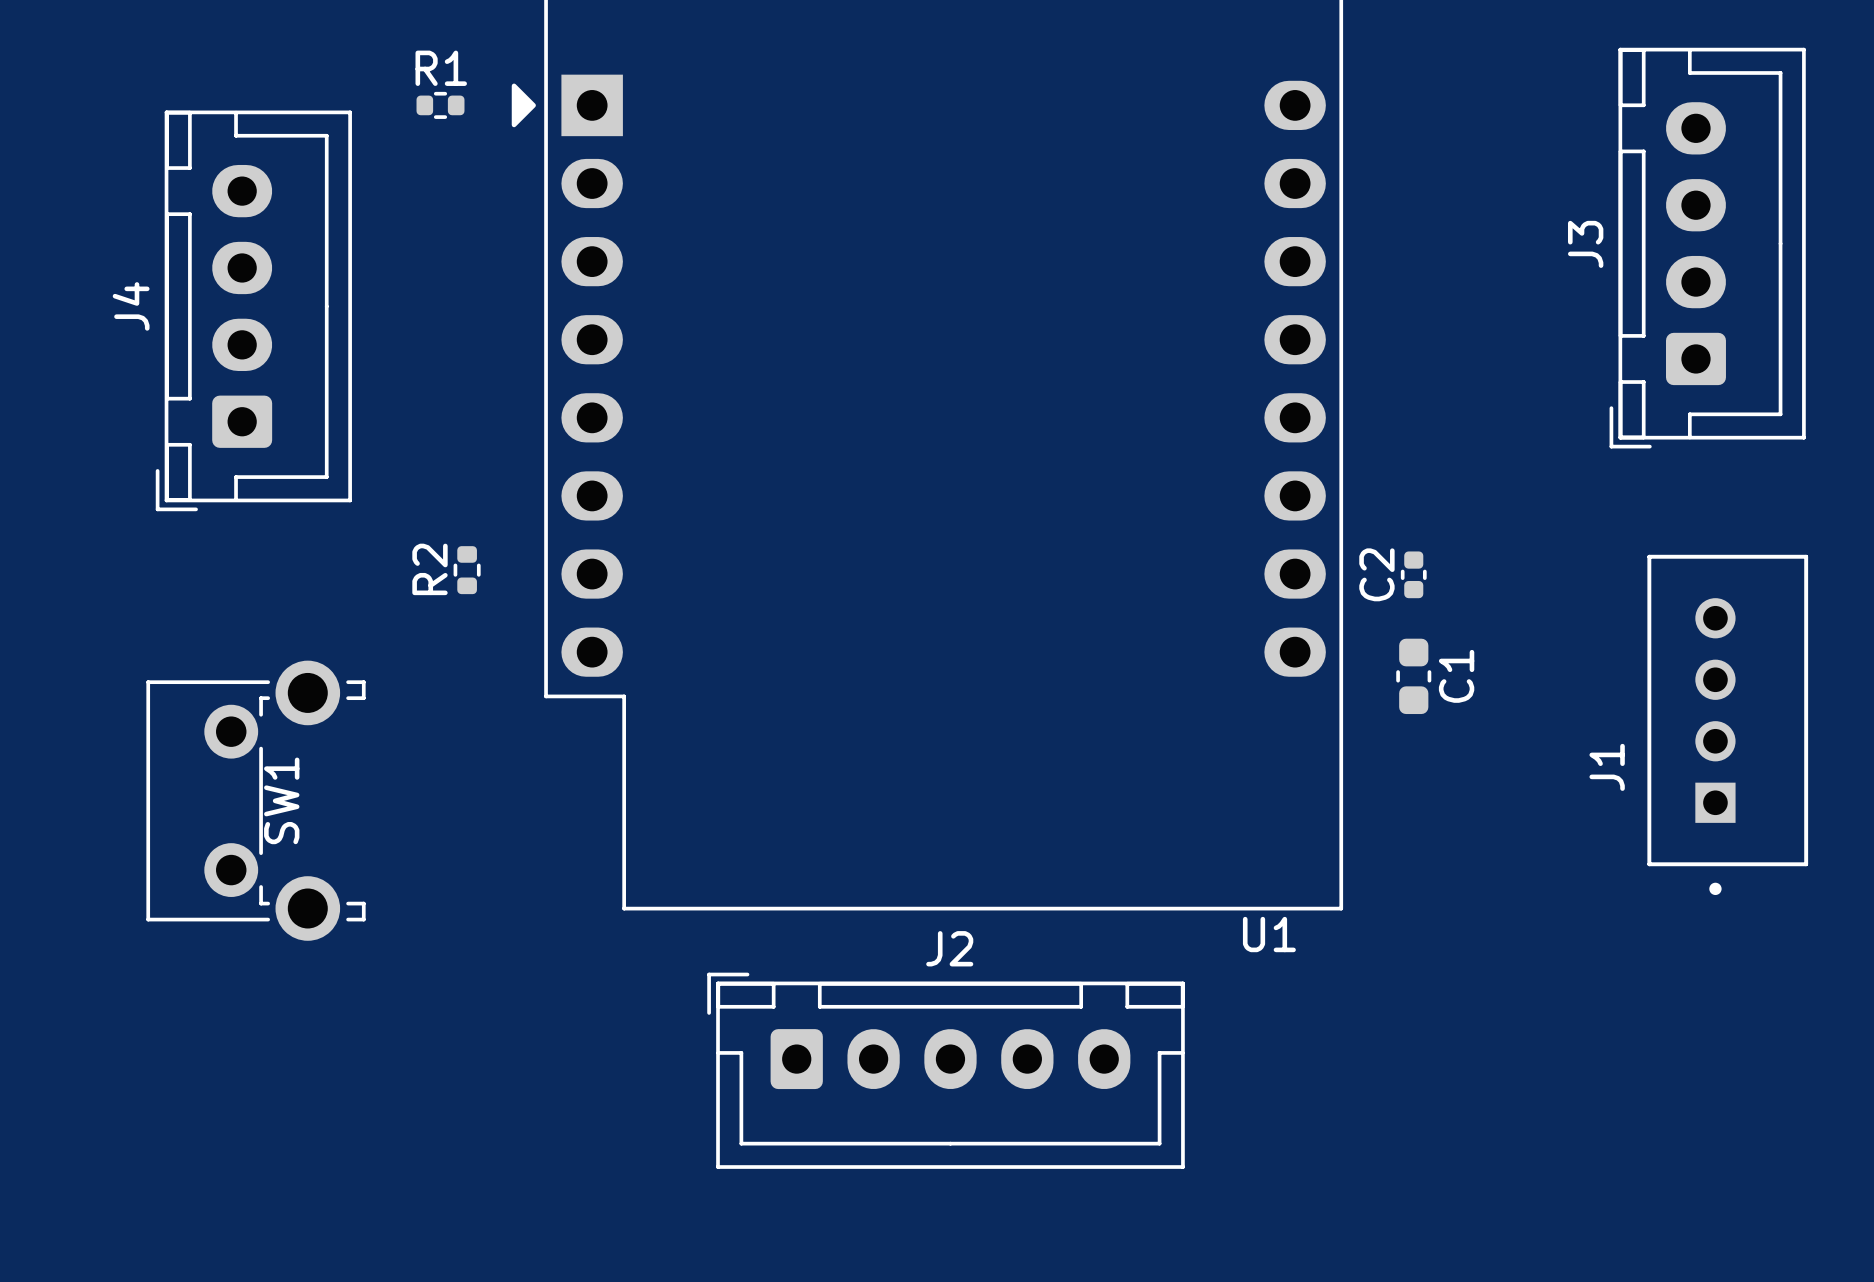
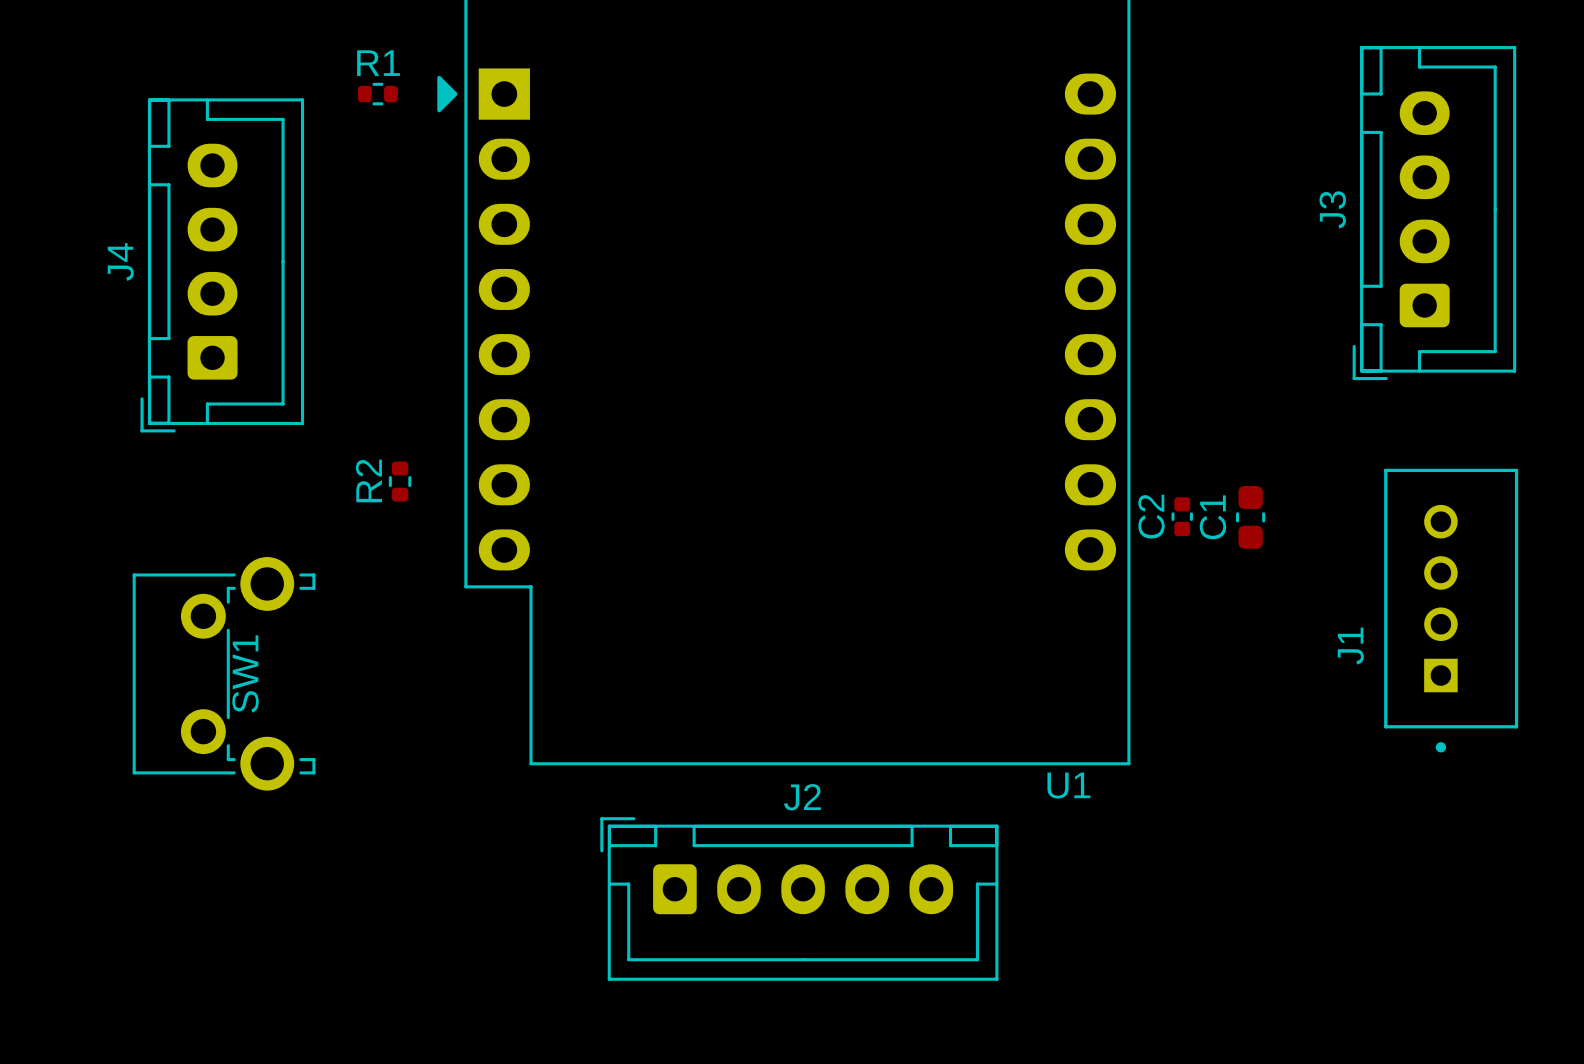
C2 position: (1413, 574) -> (1182, 516)
C1 position: (1413, 676) -> (1250, 517)
C1 name position: C1 (1456, 676) -> C1 (1212, 517)

